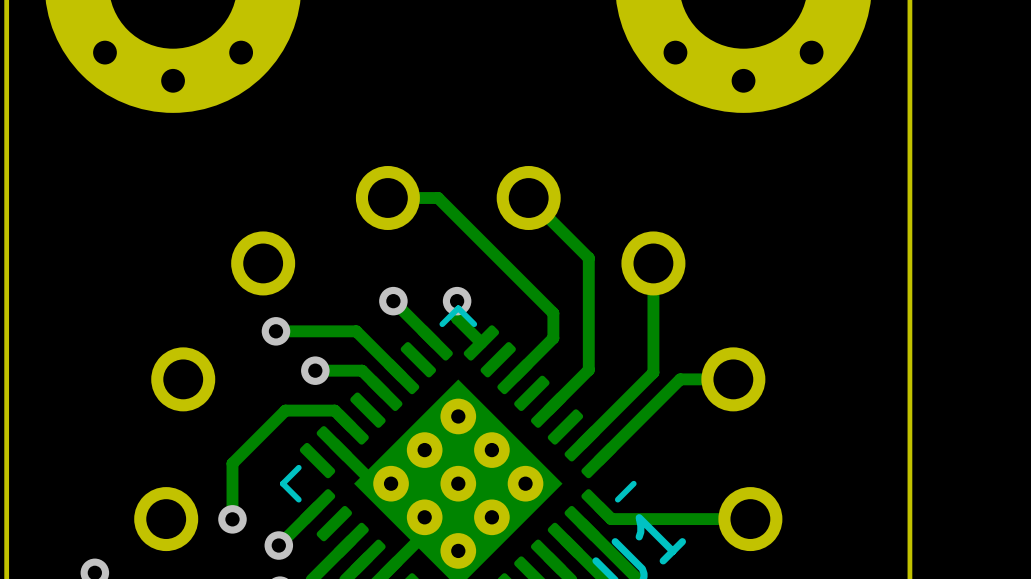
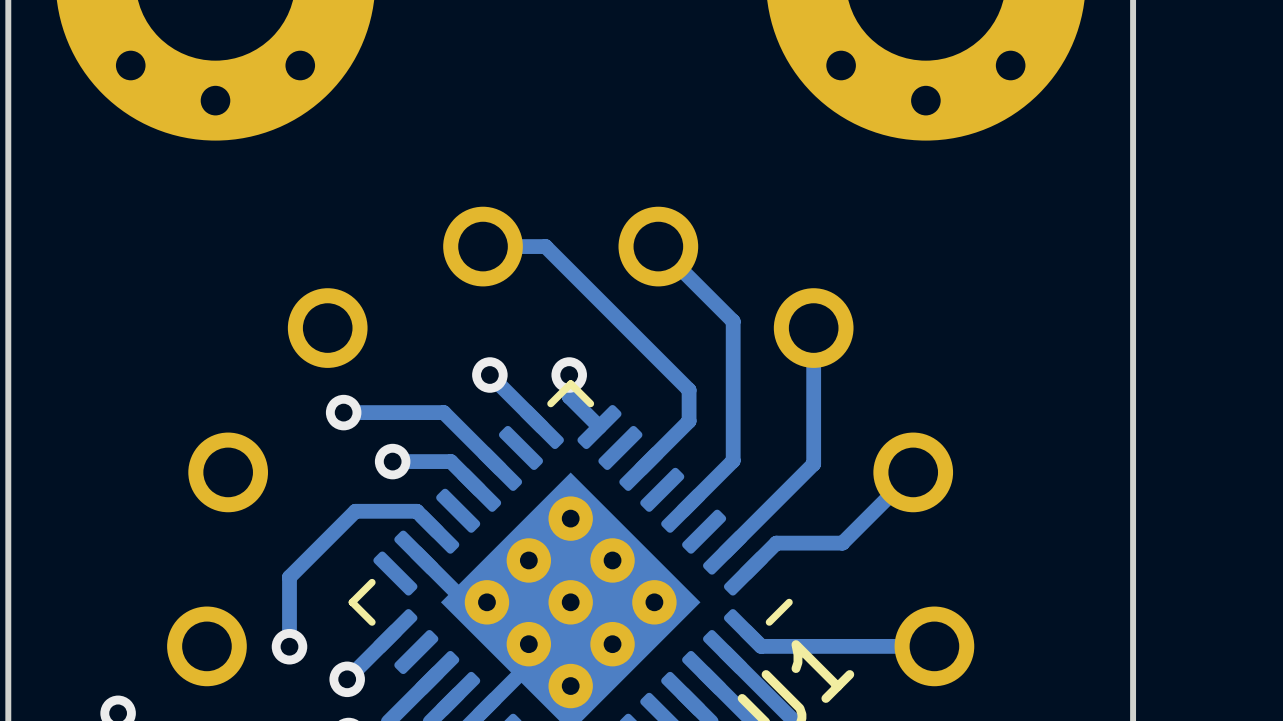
track: (733, 379) (680, 379) (623, 436) -> (913, 472) (842, 543) (776, 543)

